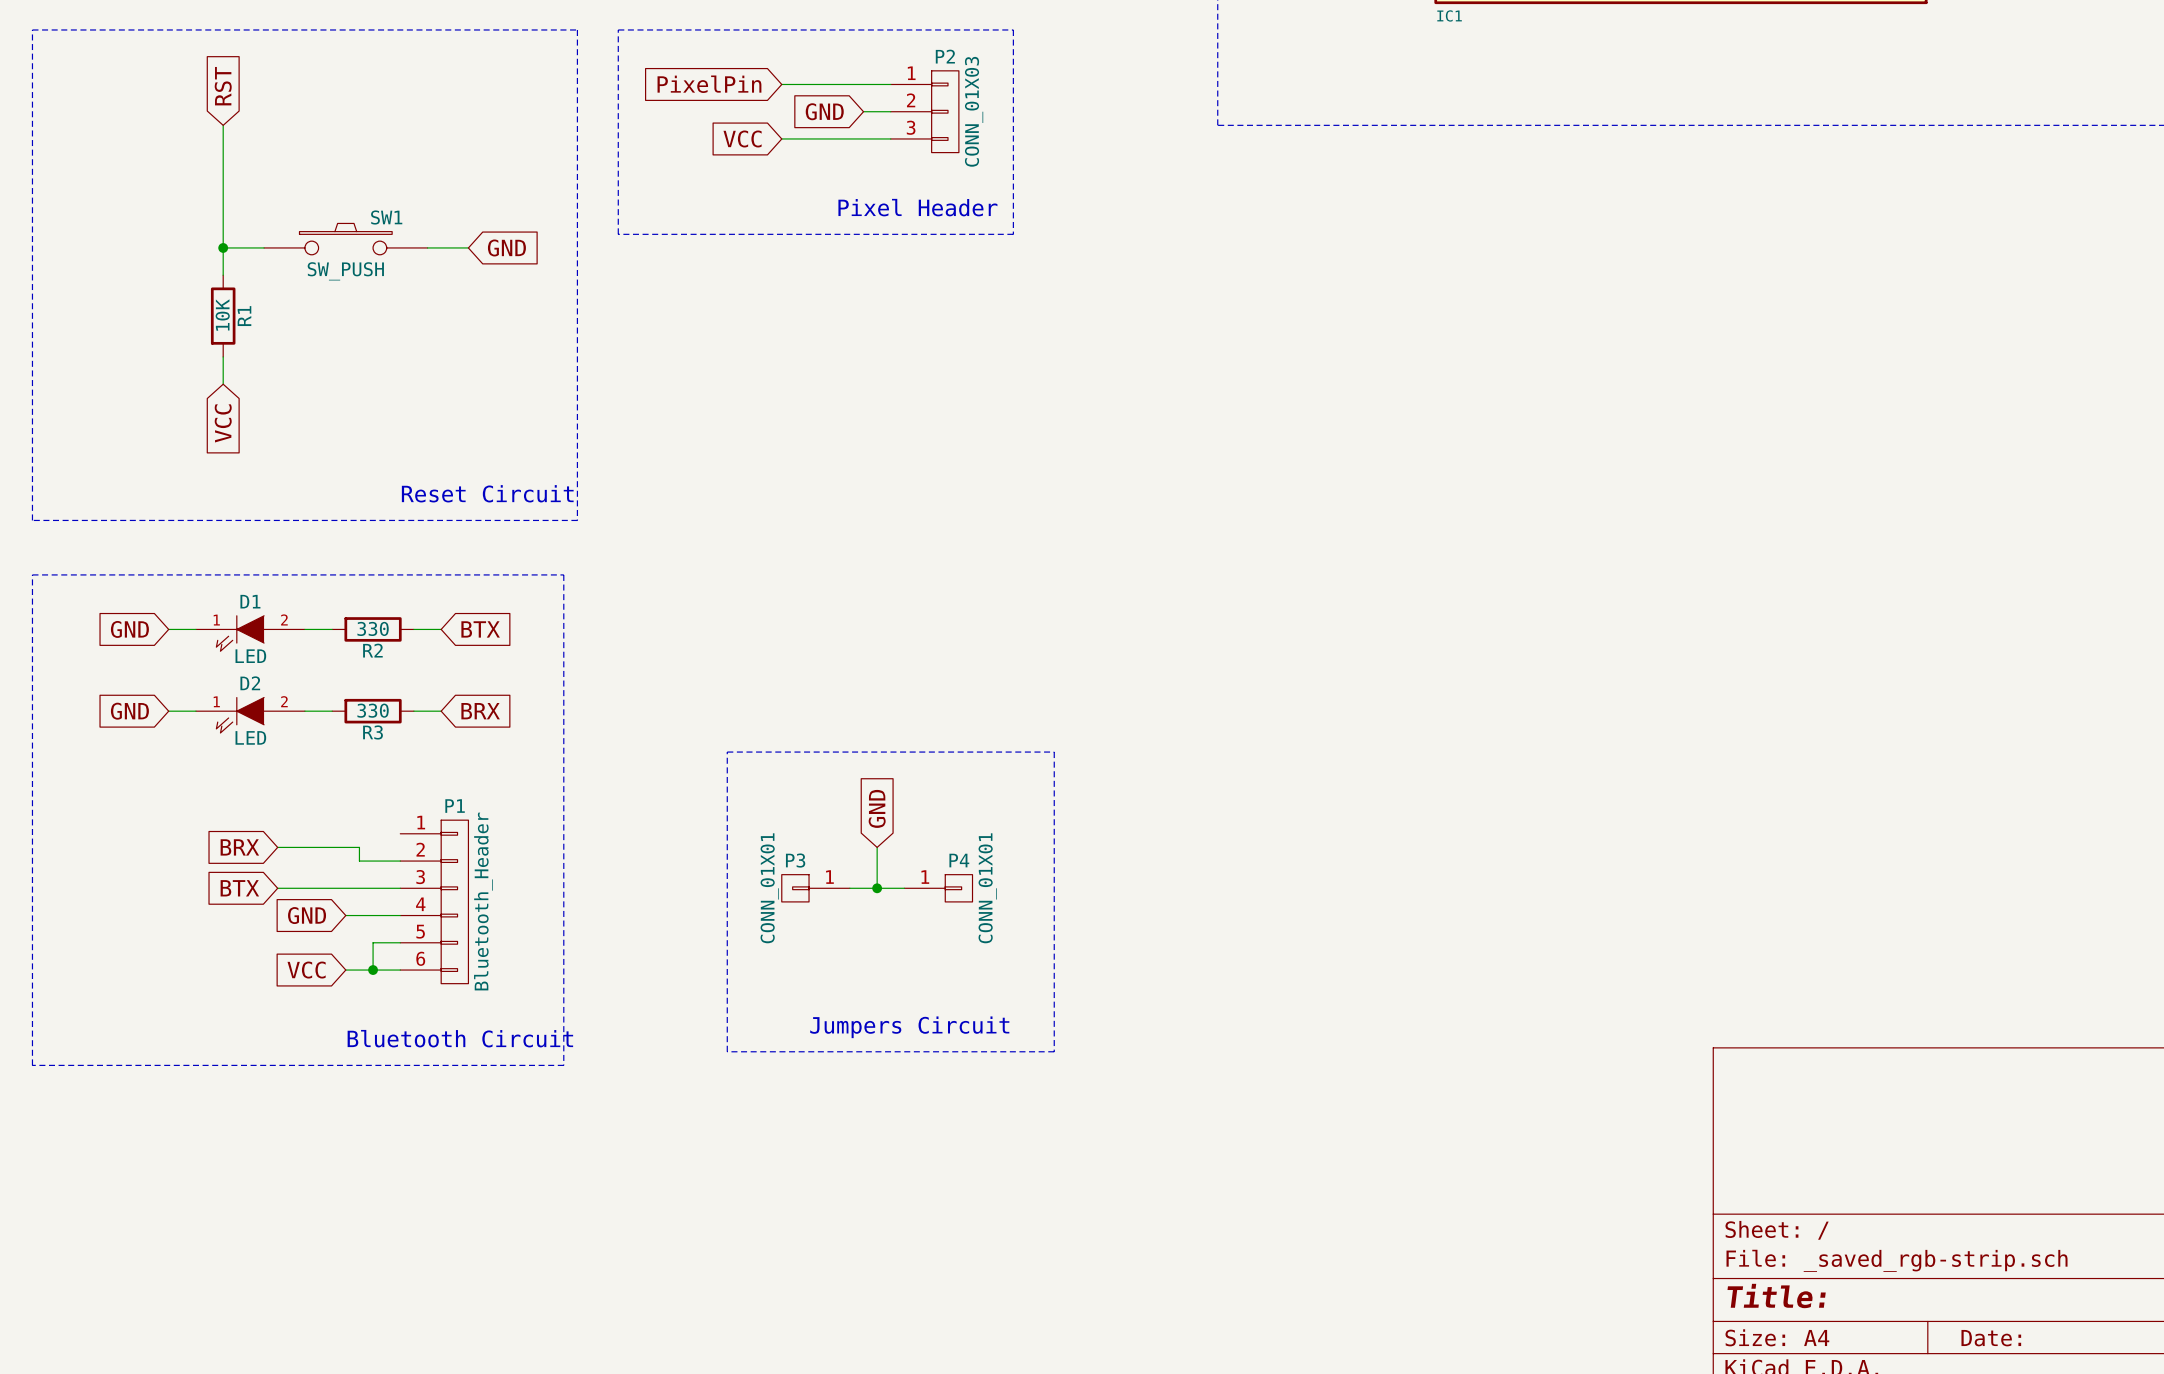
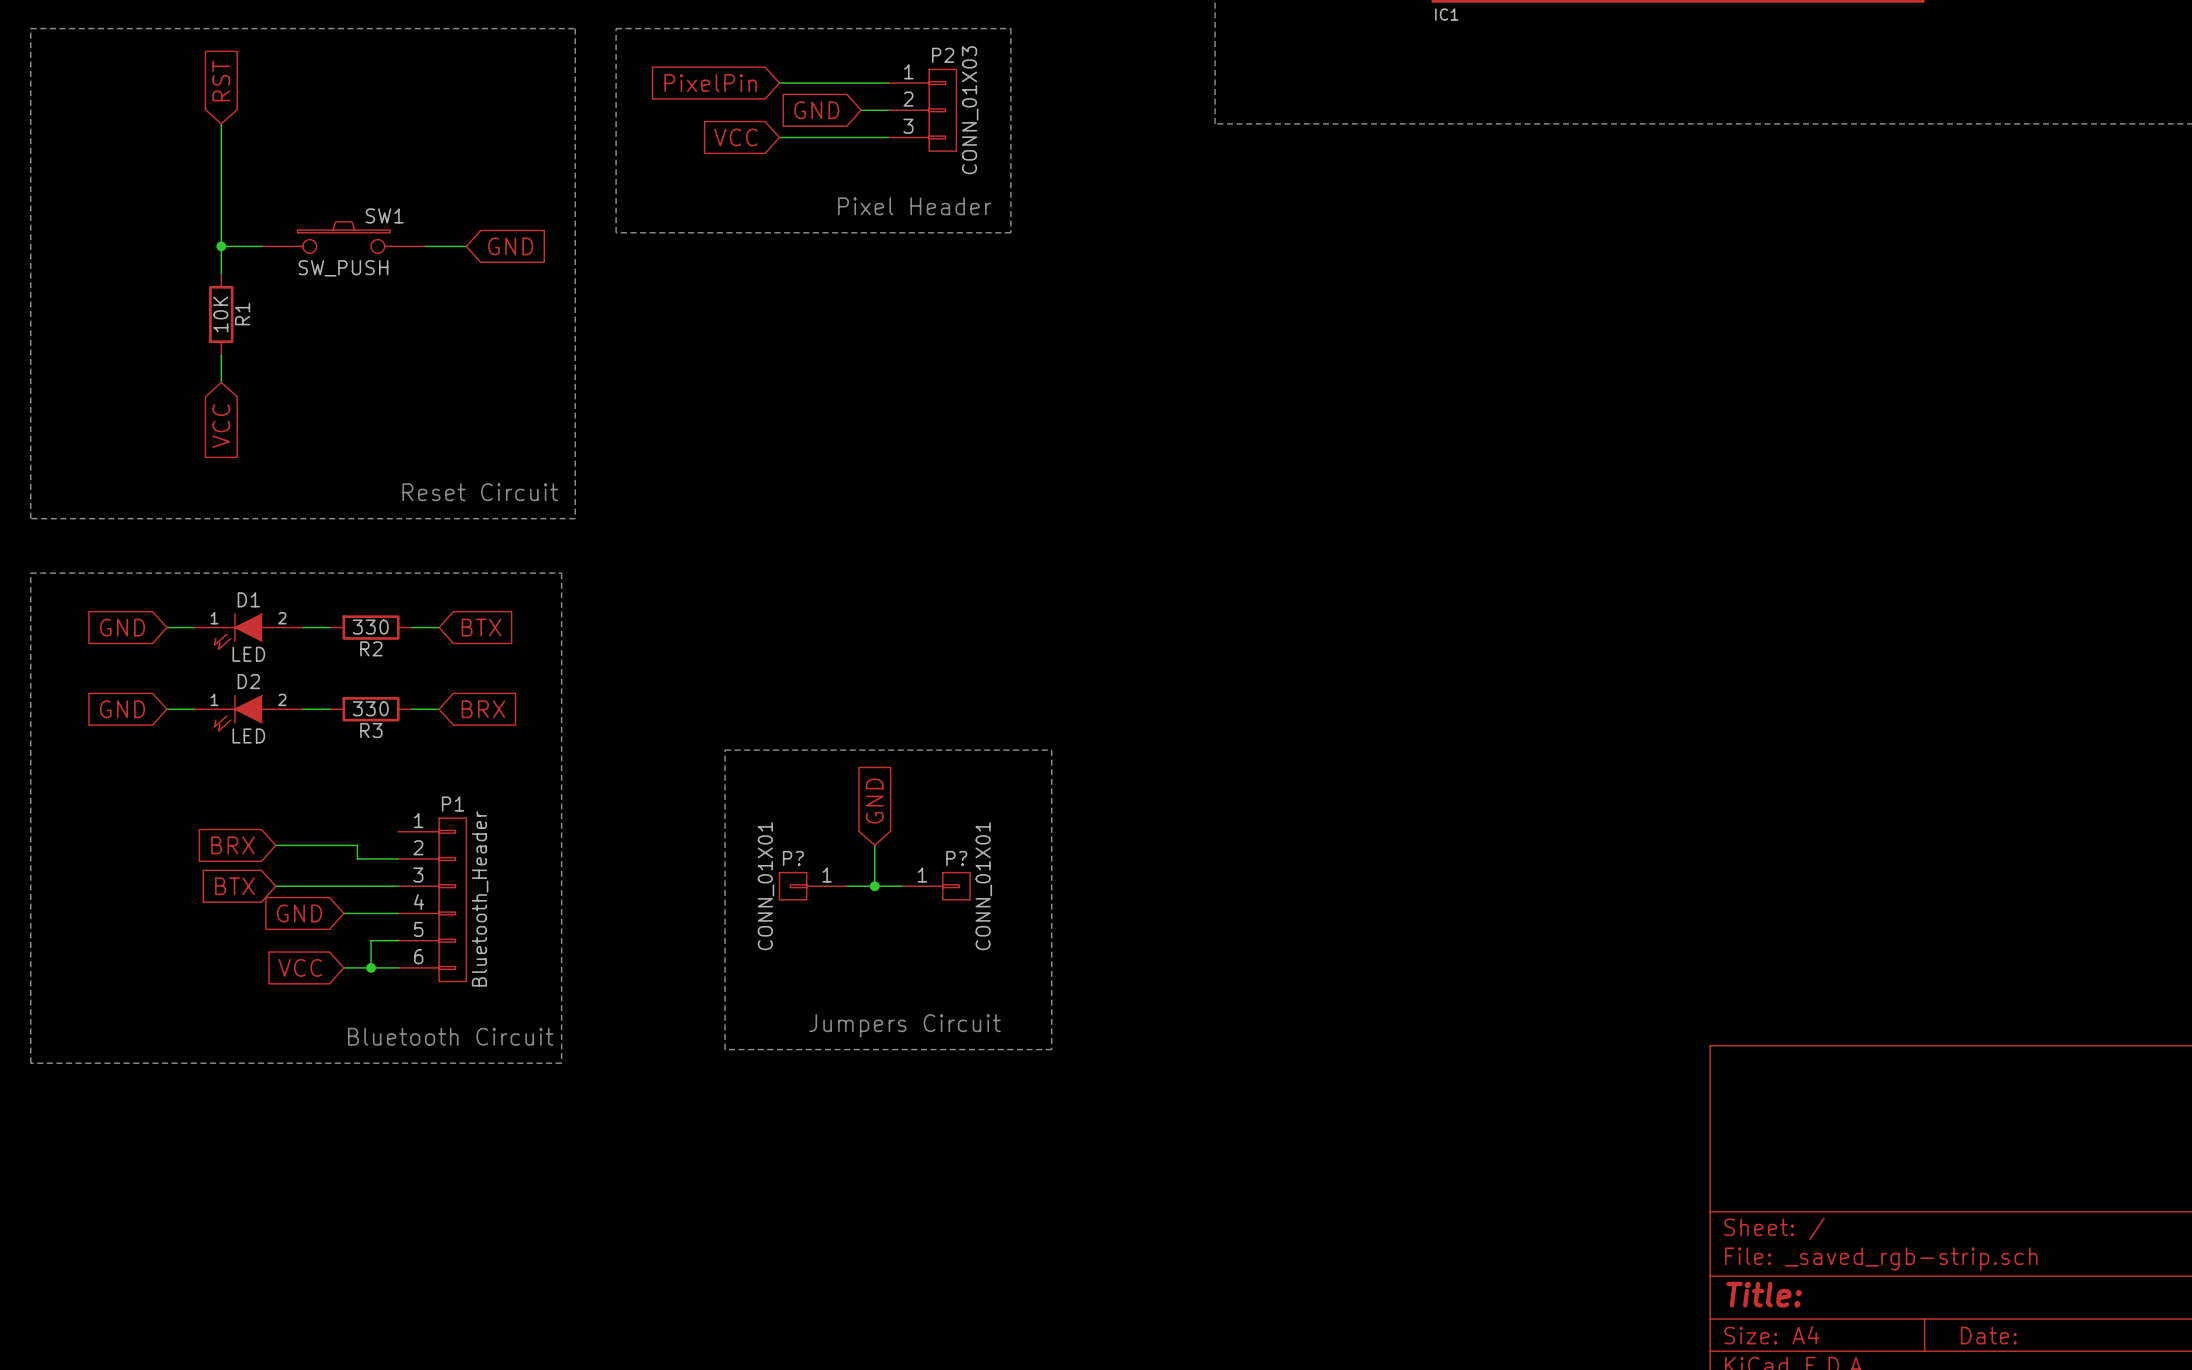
P3 name: P3 (795, 860) -> P? (793, 858)
P4 name: P4 (959, 860) -> P? (956, 858)

